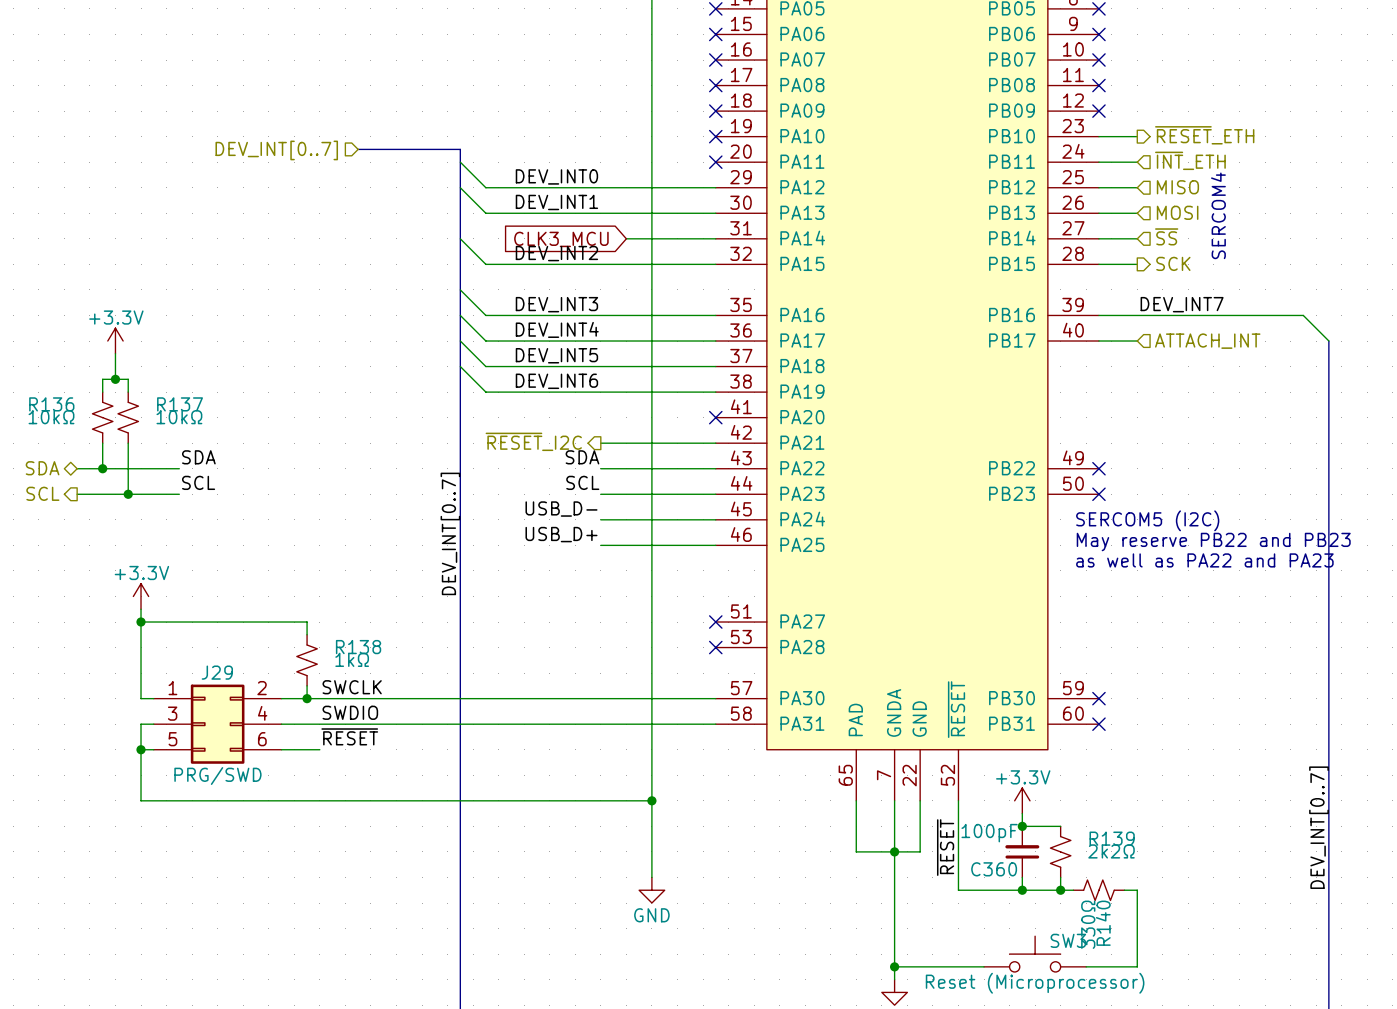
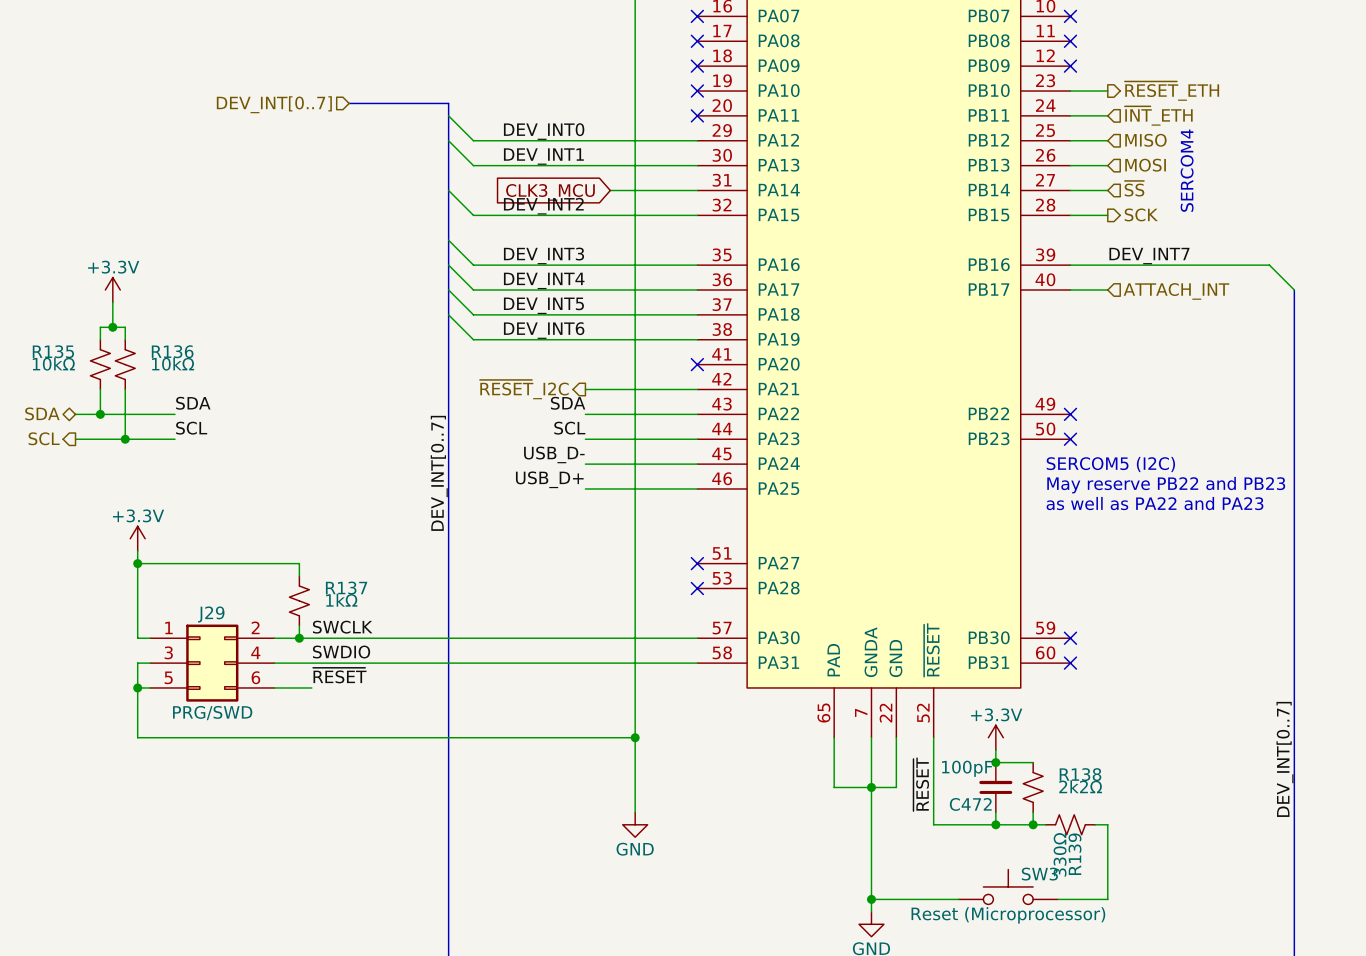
R136 name: R136 (51, 404) -> R135 (53, 351)
R137 name: R137 (180, 404) -> R136 (172, 351)
R138 name: R138 (358, 647) -> R137 (346, 588)
R139 name: R139 (1112, 838) -> R138 (1080, 774)
C360 name: C360 (994, 869) -> C472 (970, 804)
R140 name: R140 (1103, 923) -> R139 (1074, 854)

